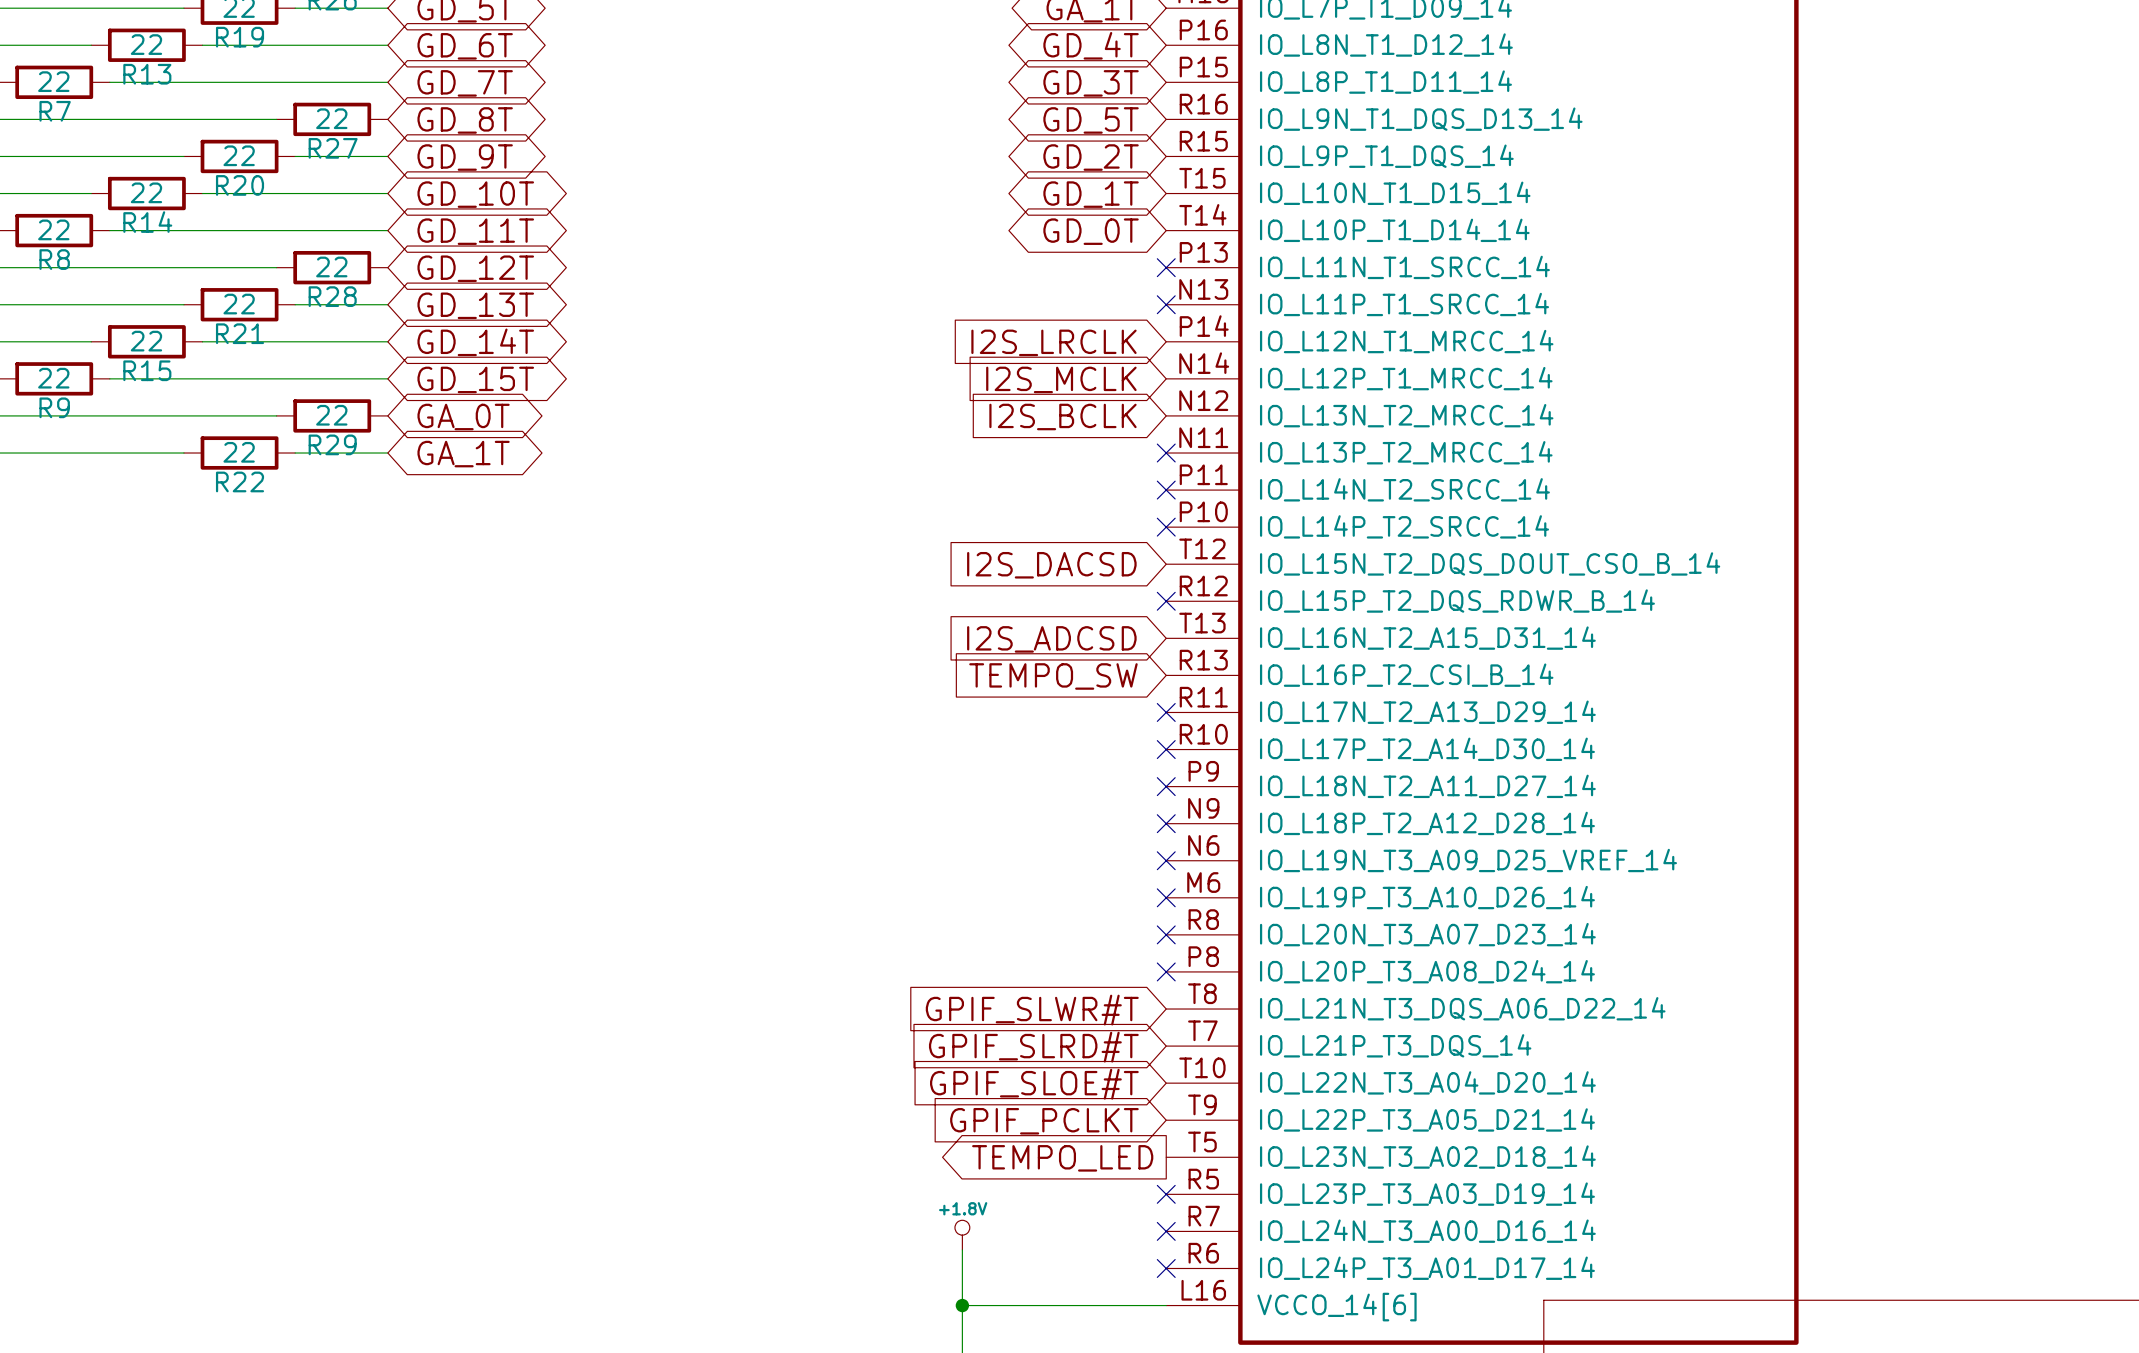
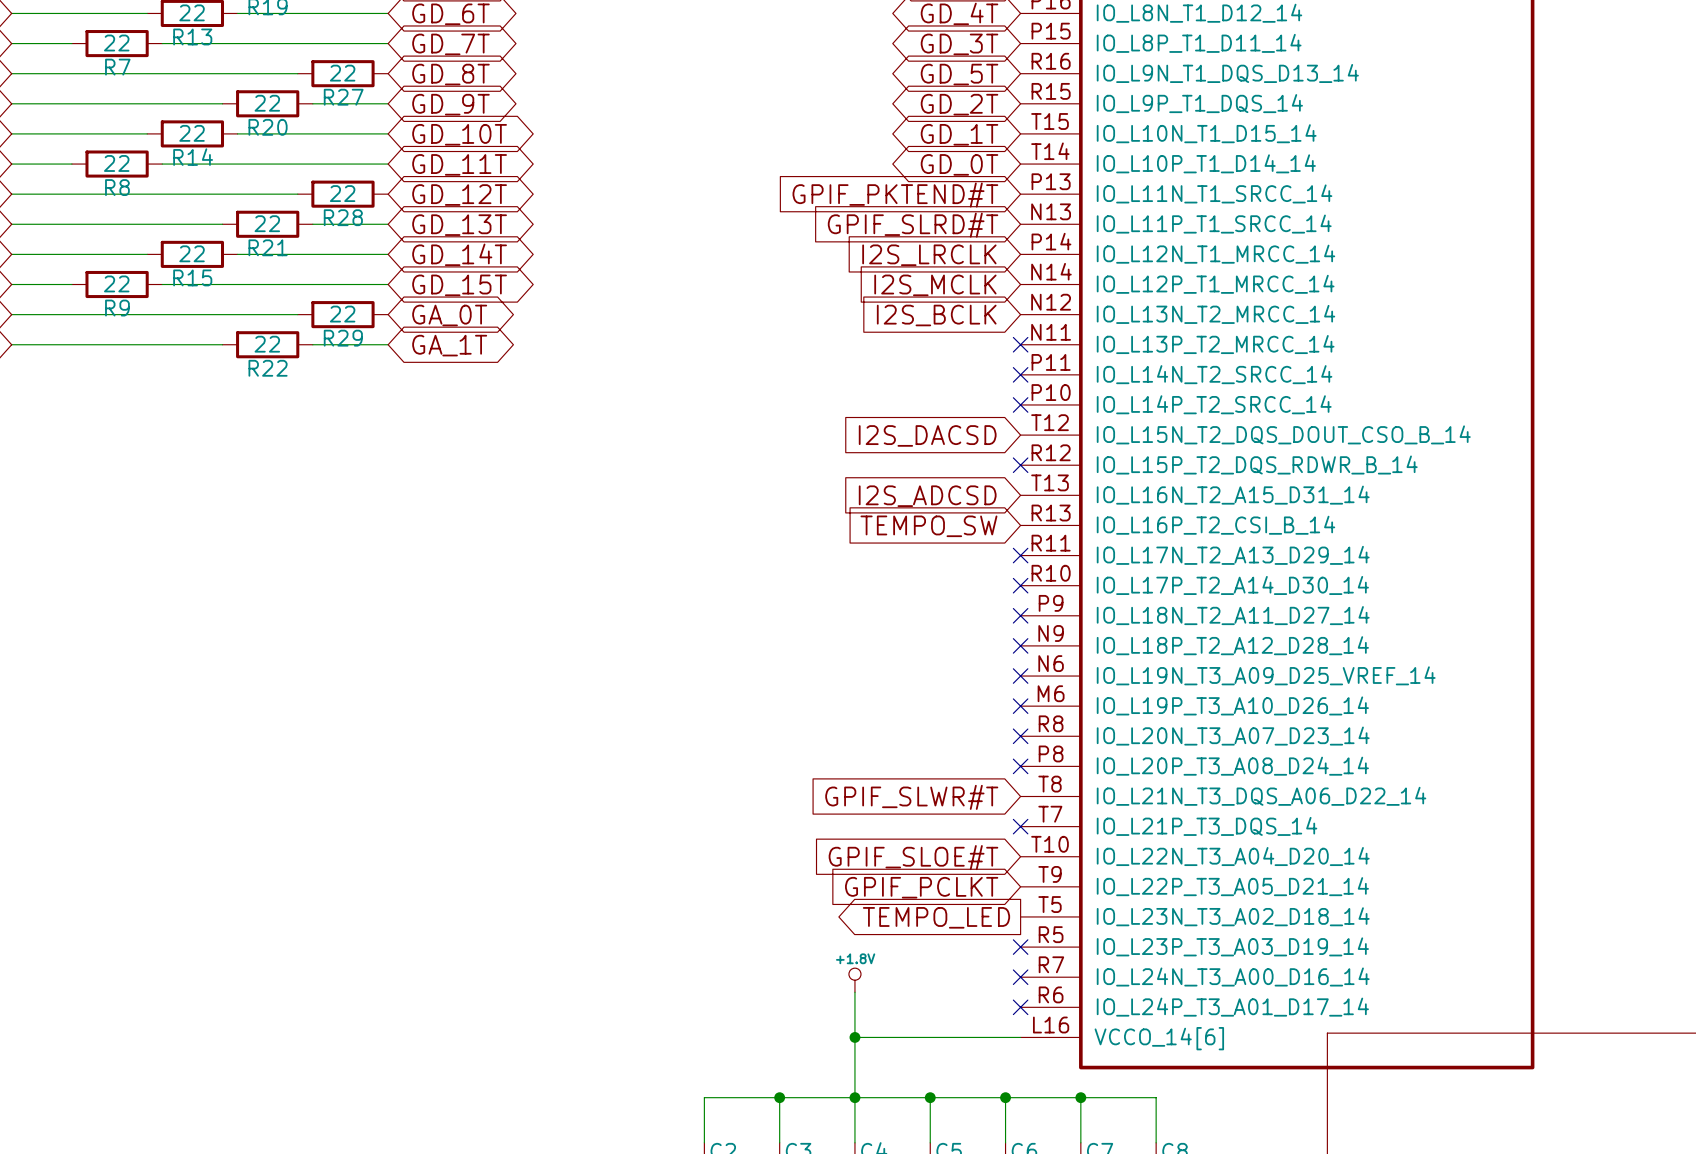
no-connect mark: (1166, 267) -> none
global label: none -> GPIF_PKTEND#T (895, 195)
no-connect mark: (1166, 304) -> none
global label: none -> GPIF_SLRD#T (913, 225)
no-connect mark: none -> (1020, 826)
global label: GPIF_SLRD#T (1033, 1047) -> none

